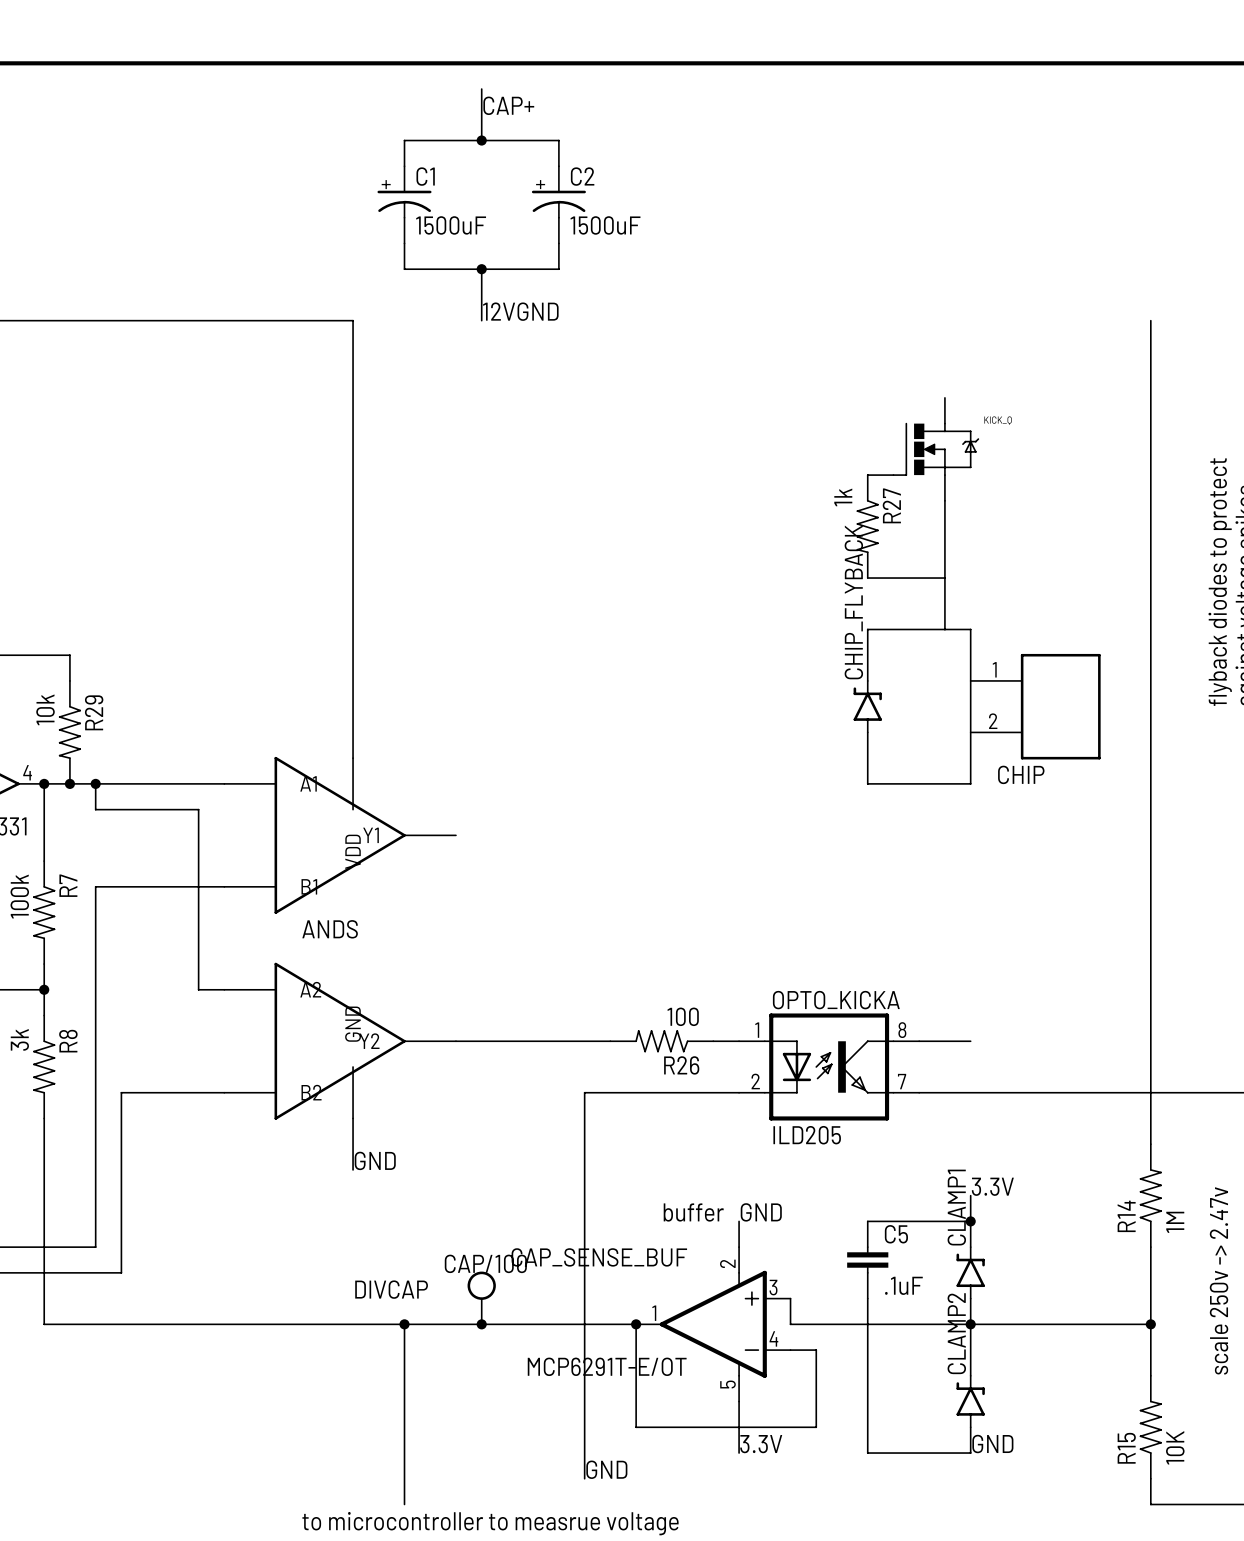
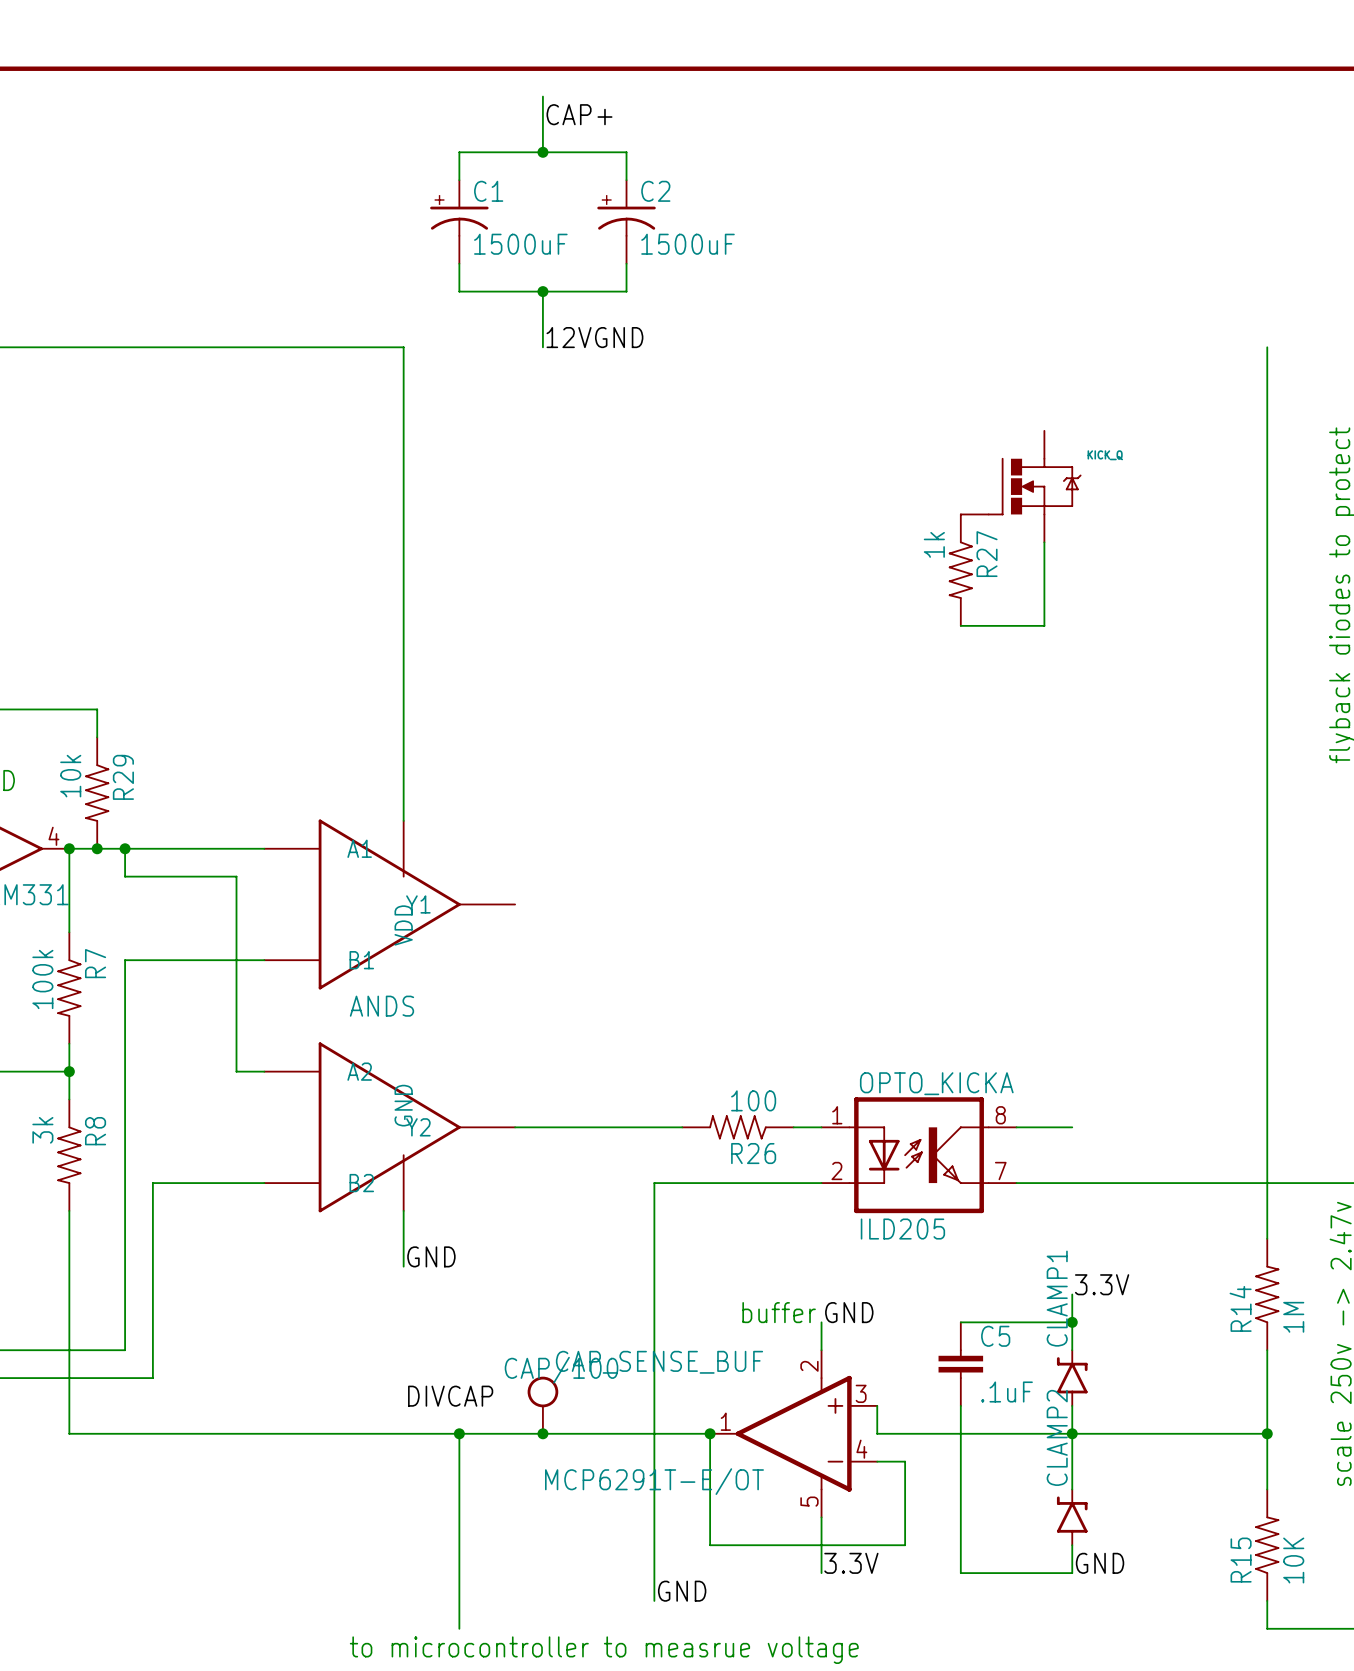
wire: (944, 578) (944, 629) -> none
wire: (867, 680) (867, 629) (970, 629) (970, 783) (867, 783) (867, 732) -> none
CHIP_FLYBACK: (867, 706) -> none
CHIP: (1035, 706) -> none

